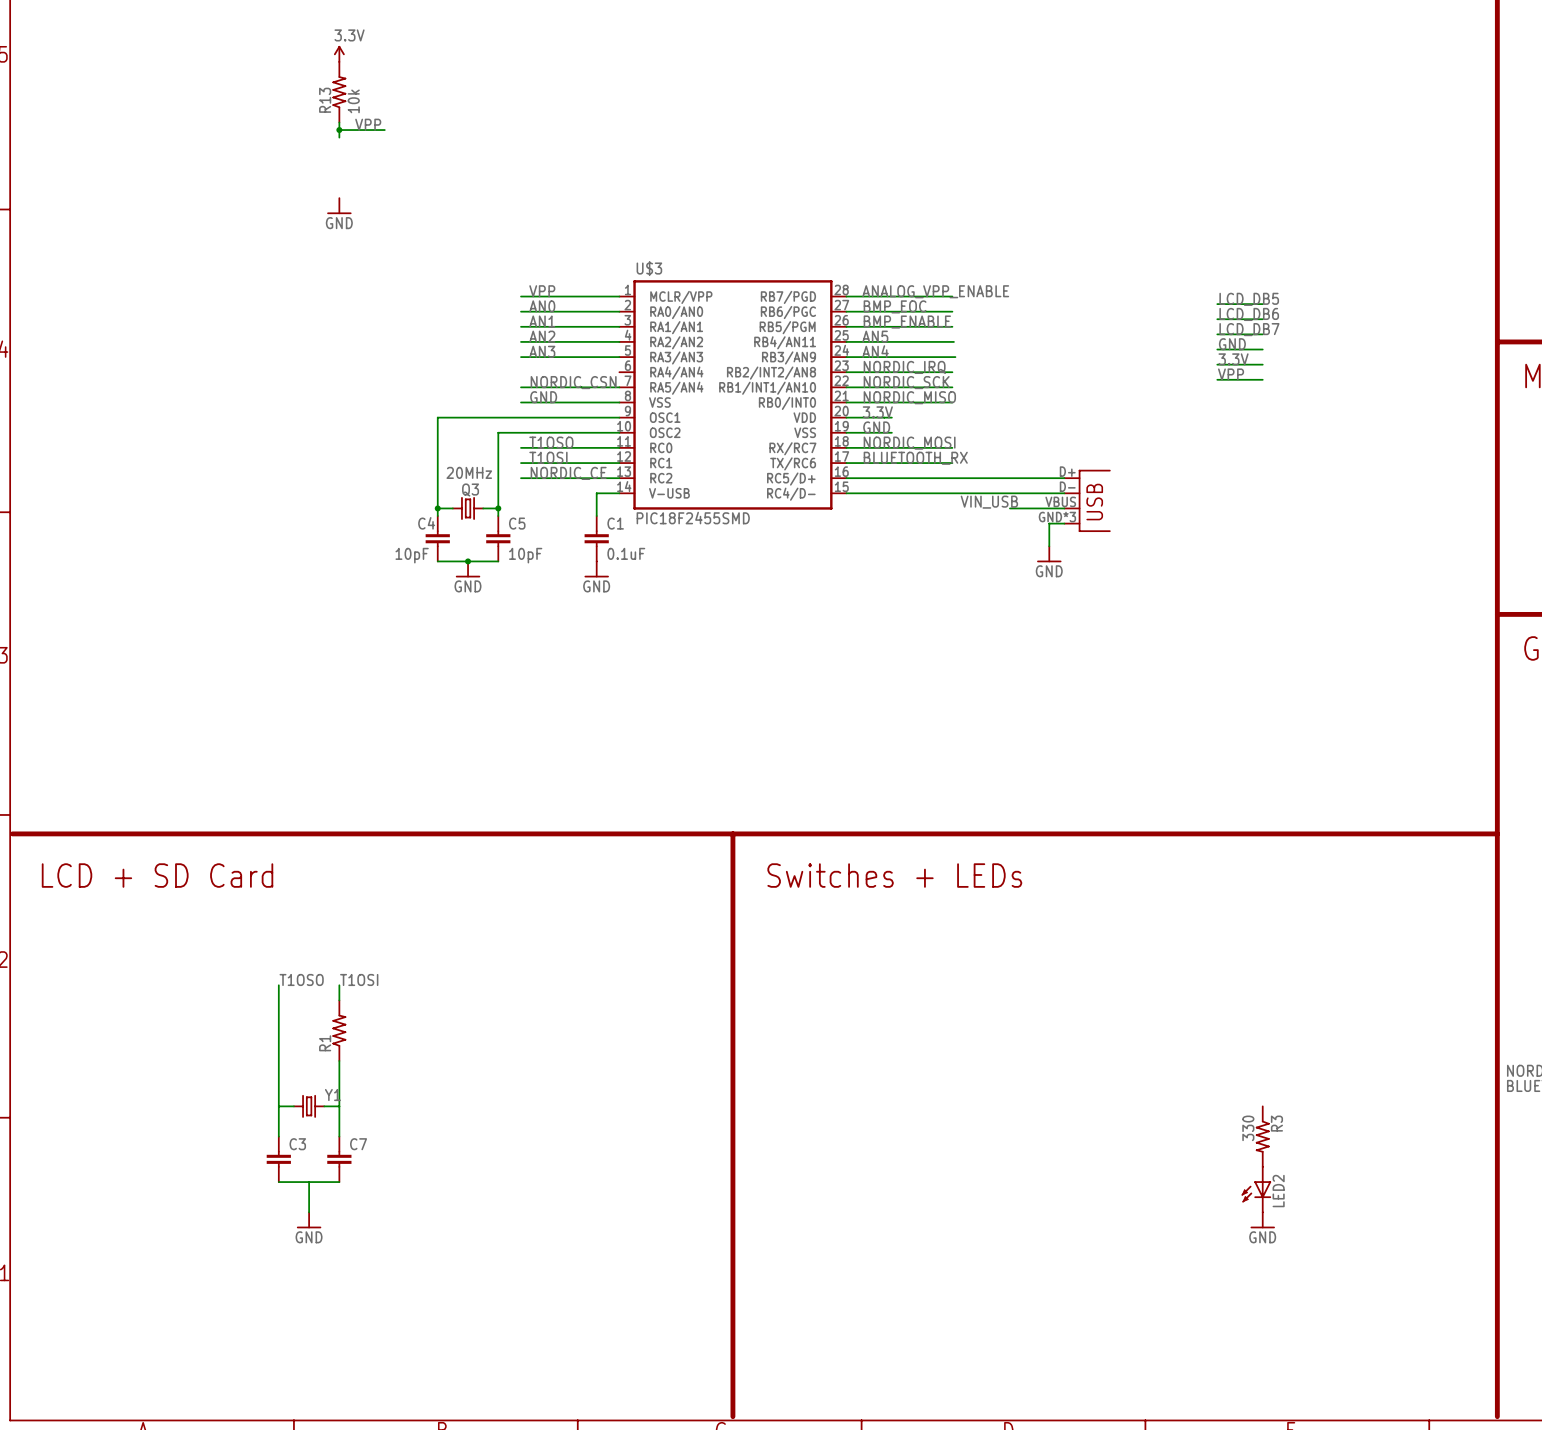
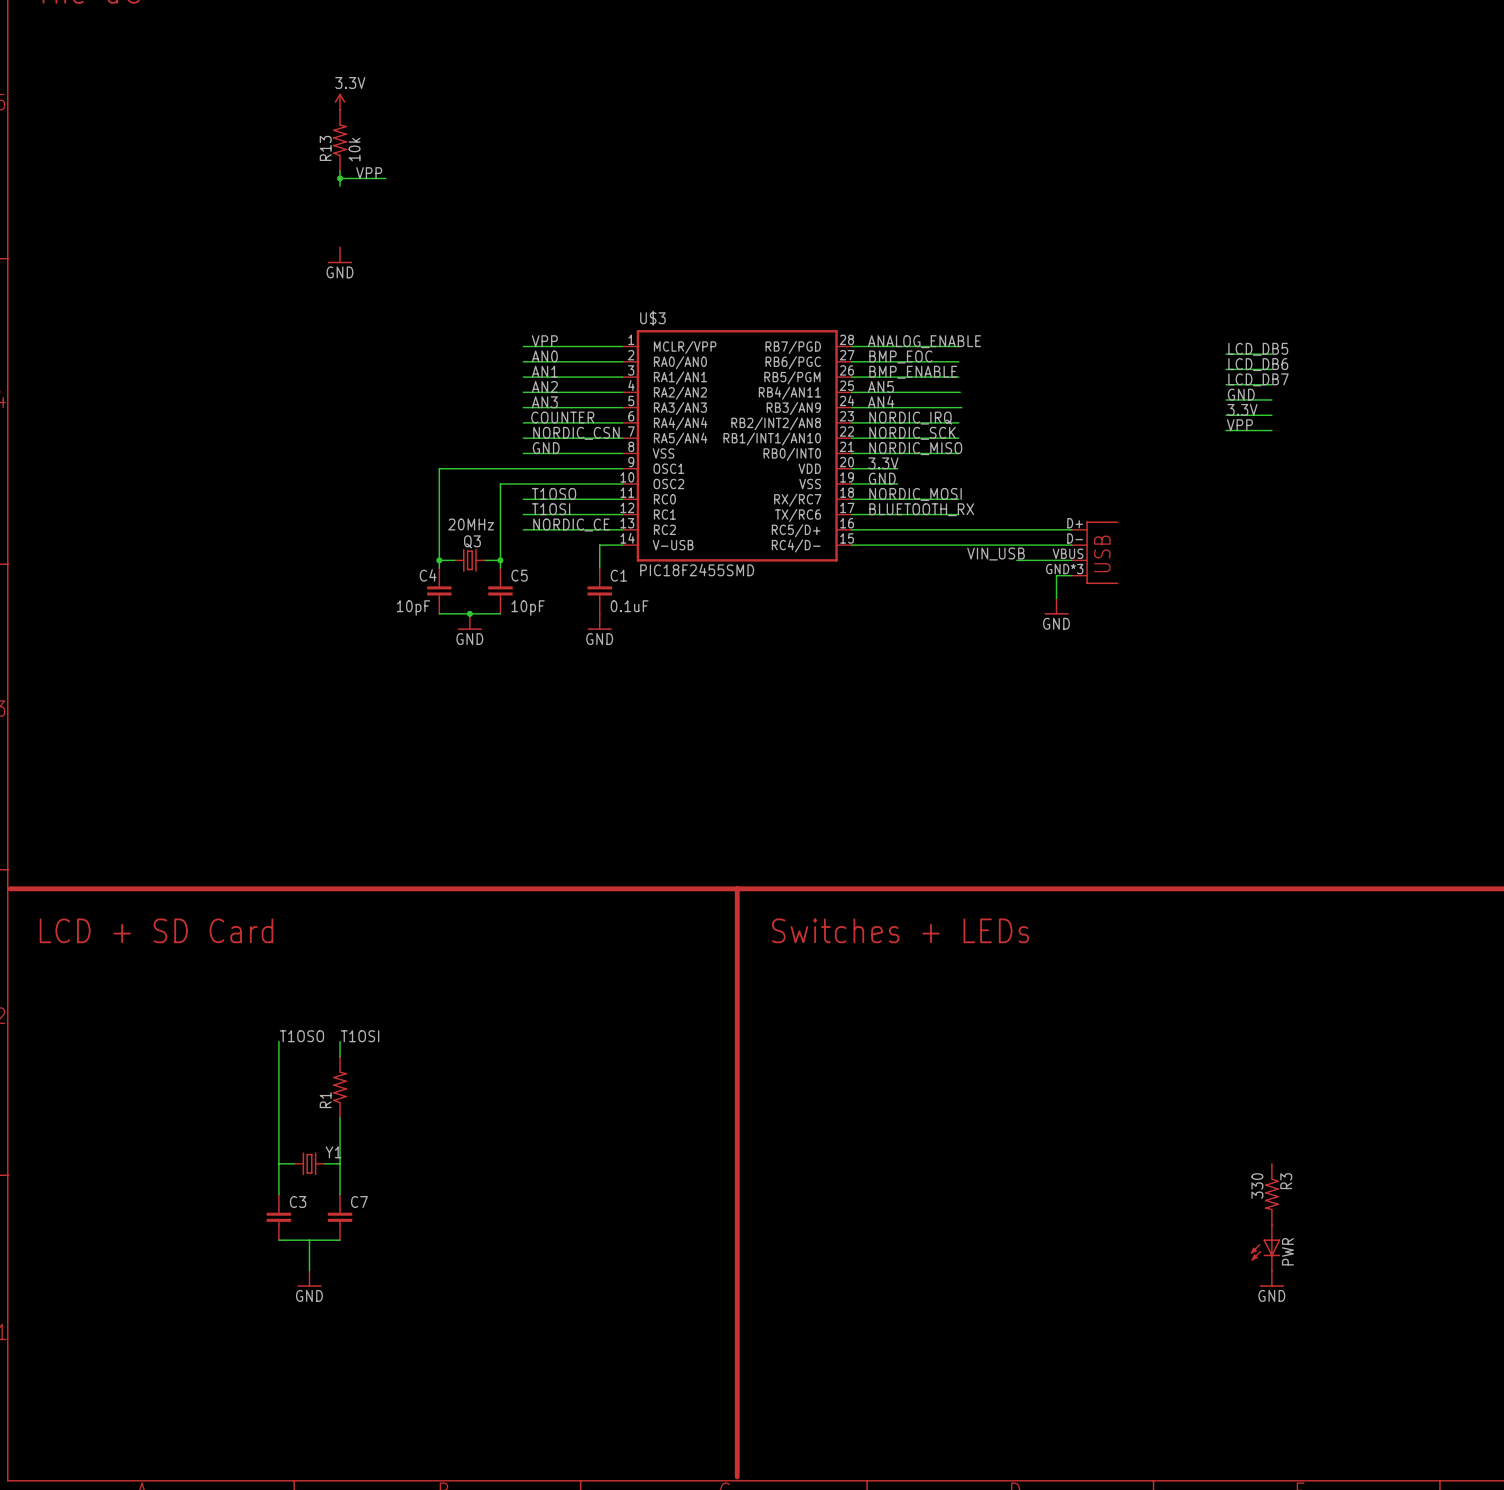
label: ANALOG_VPP_ENABLE (935, 291) -> ANALOG_ENABLE (924, 341)
label: none -> COUNTER (562, 417)
wire: none -> (523, 422) (622, 422)
LED2 name: LED2 (1278, 1191) -> PWR (1287, 1251)

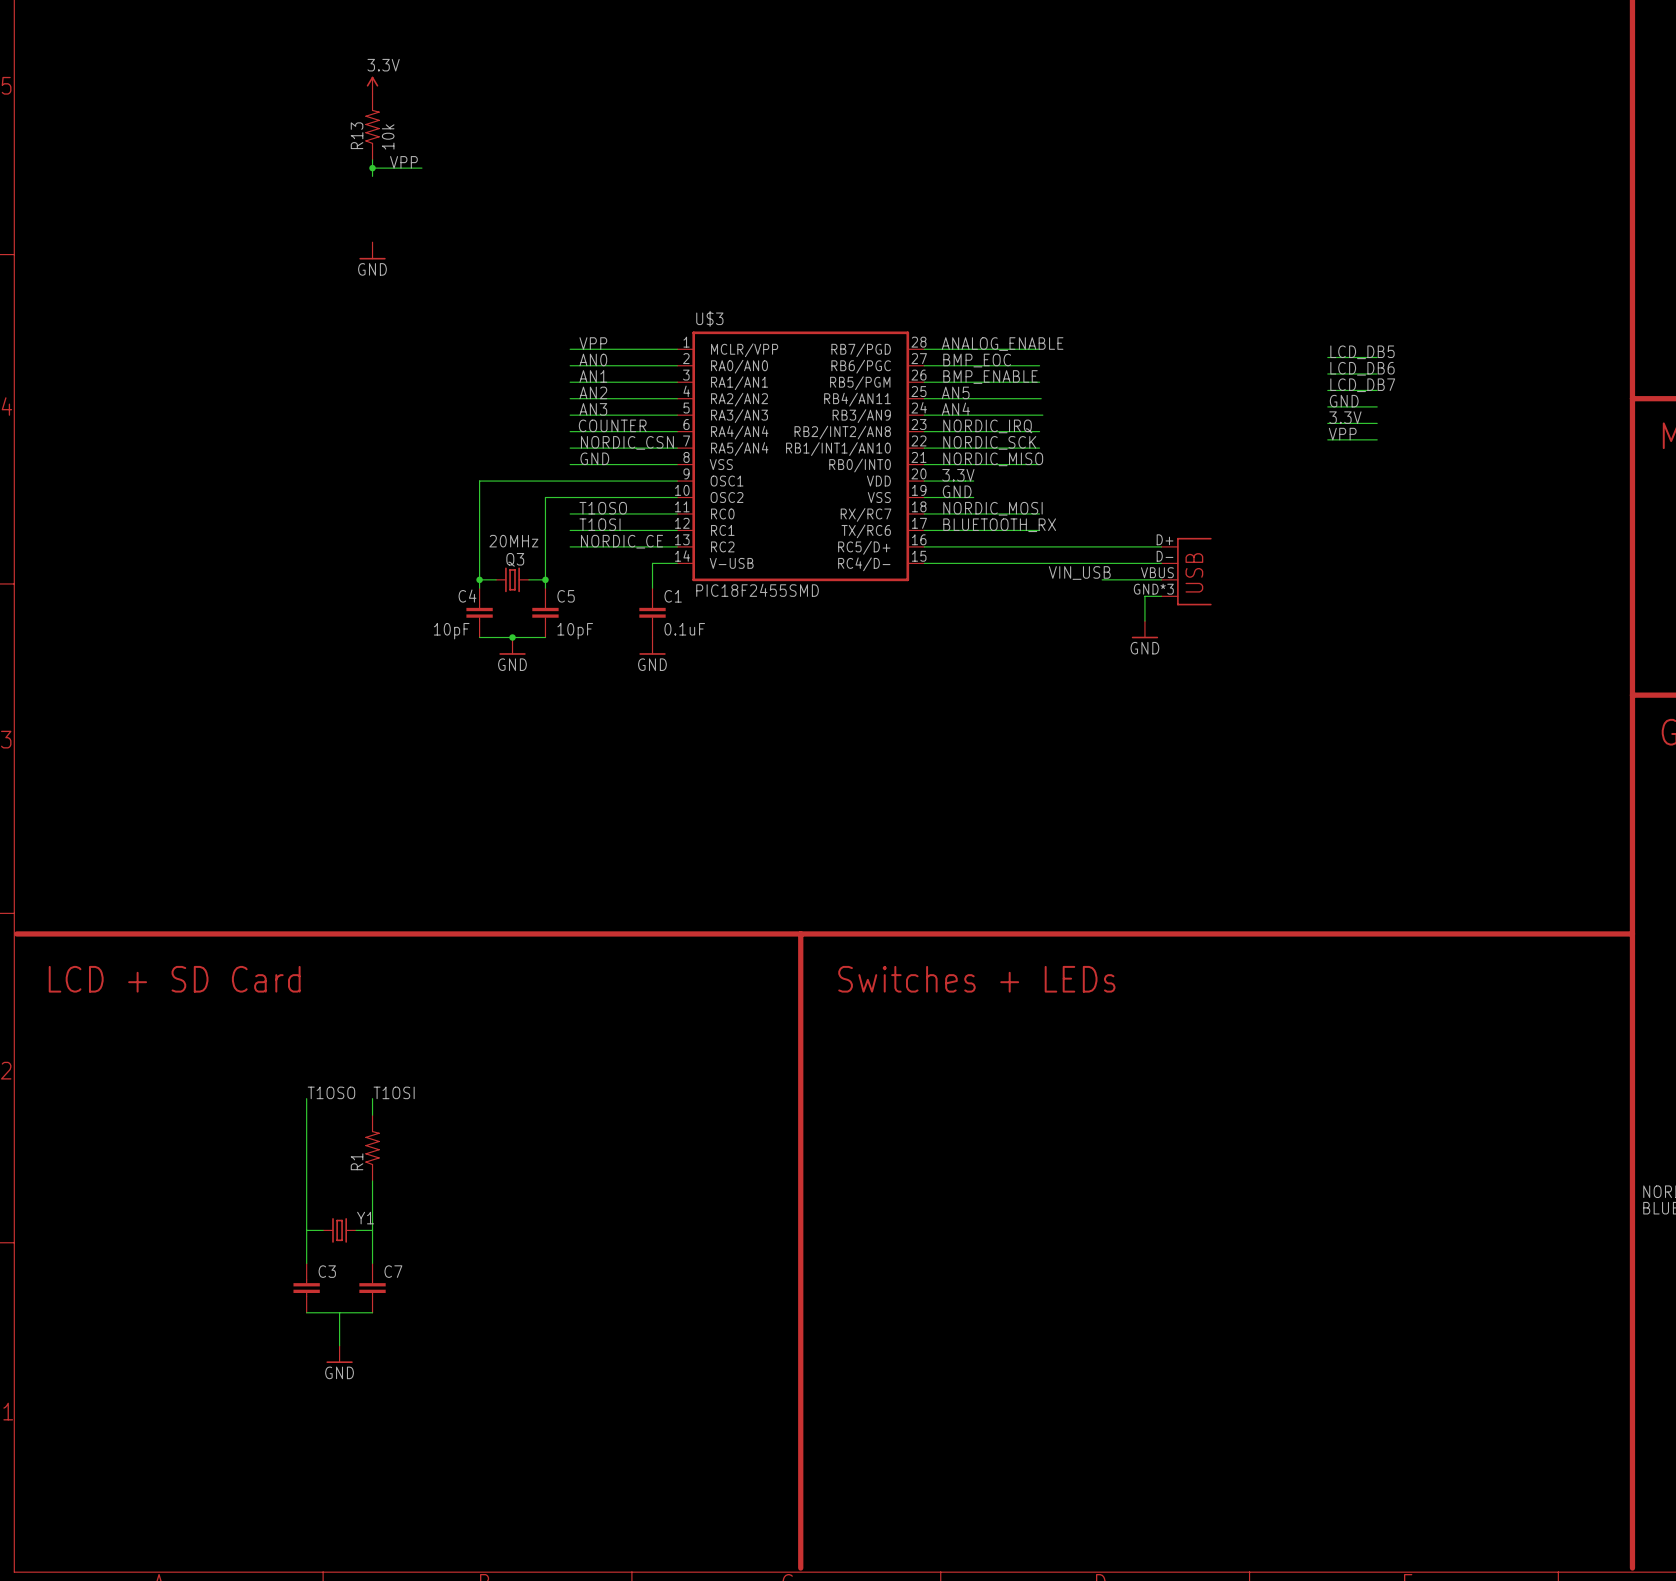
R3: 330 (1271, 1194) -> none
PWR: (1265, 1247) -> none
power symbol: GND (1271, 1278) -> none

